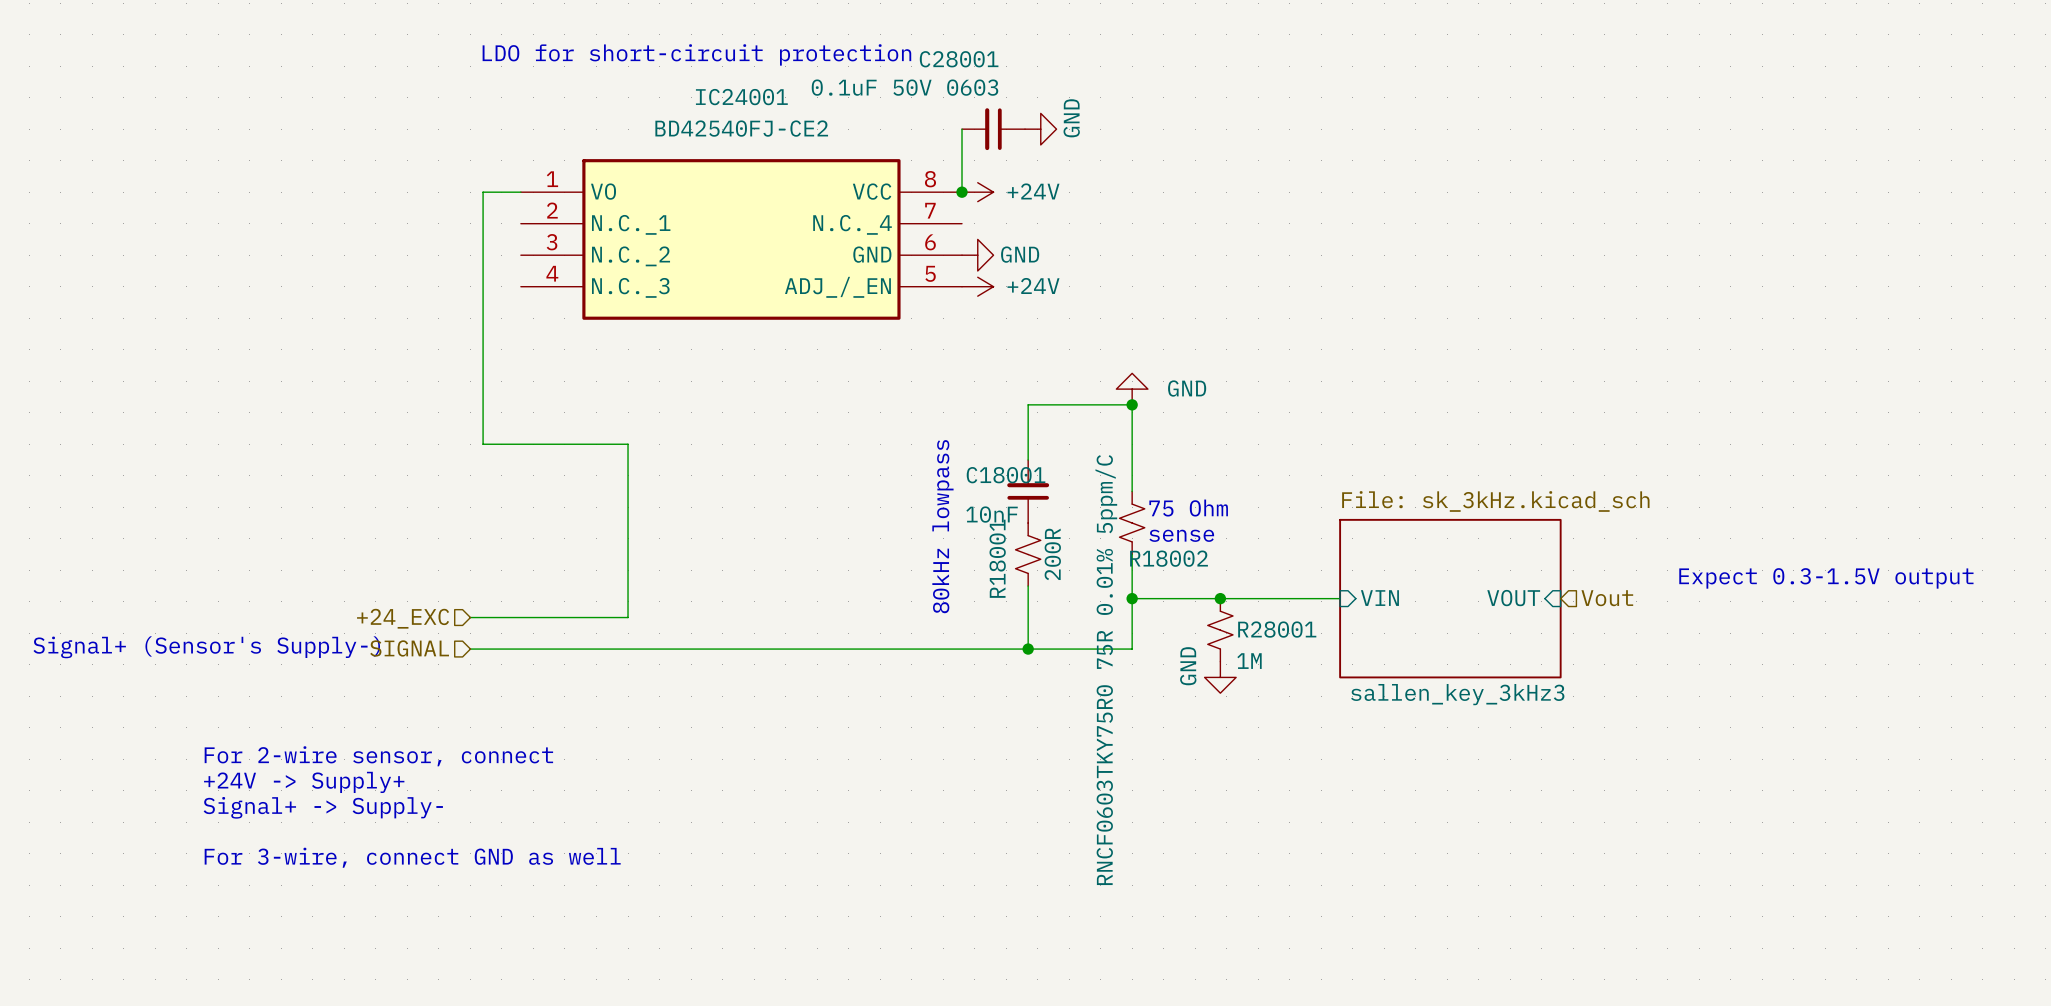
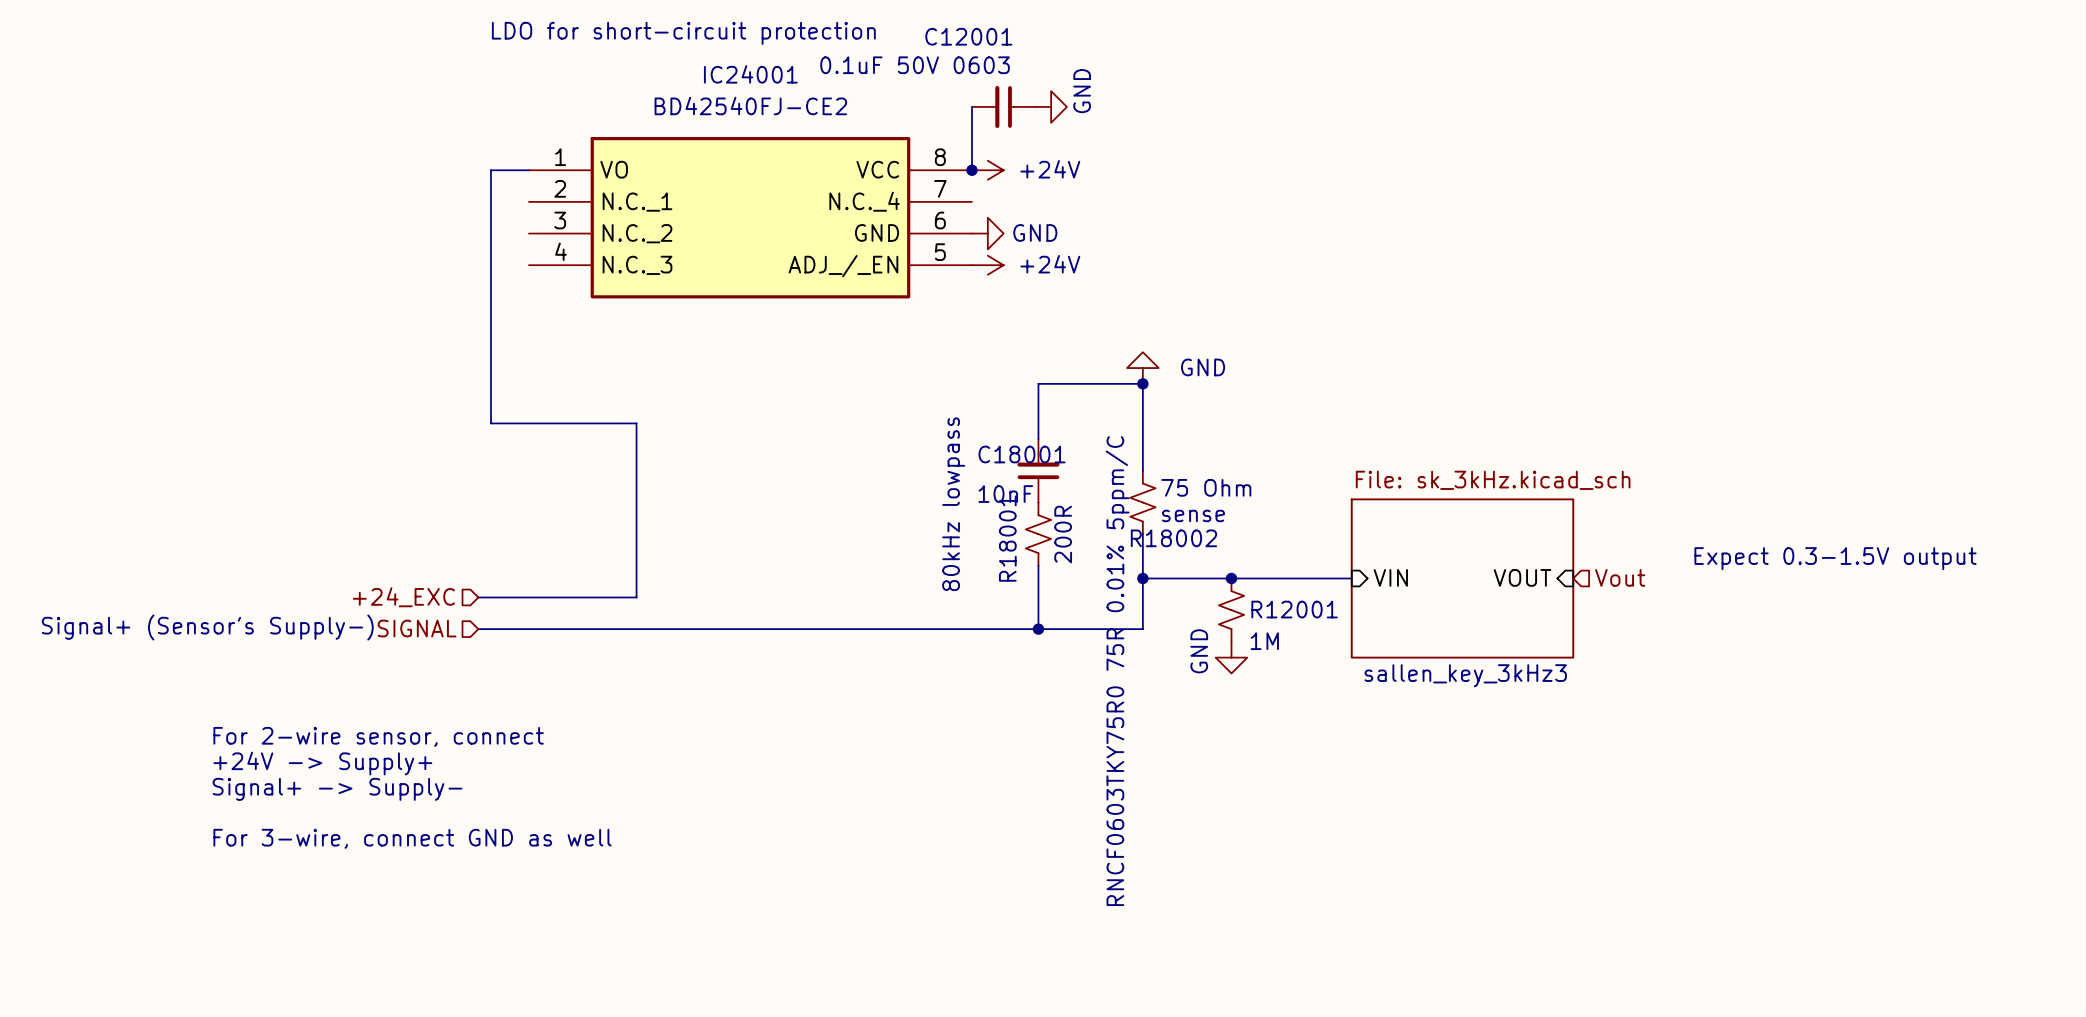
C28001 name: C28001 (959, 59) -> C12001 (968, 36)
R28001 name: R28001 (1277, 629) -> R12001 (1294, 609)

